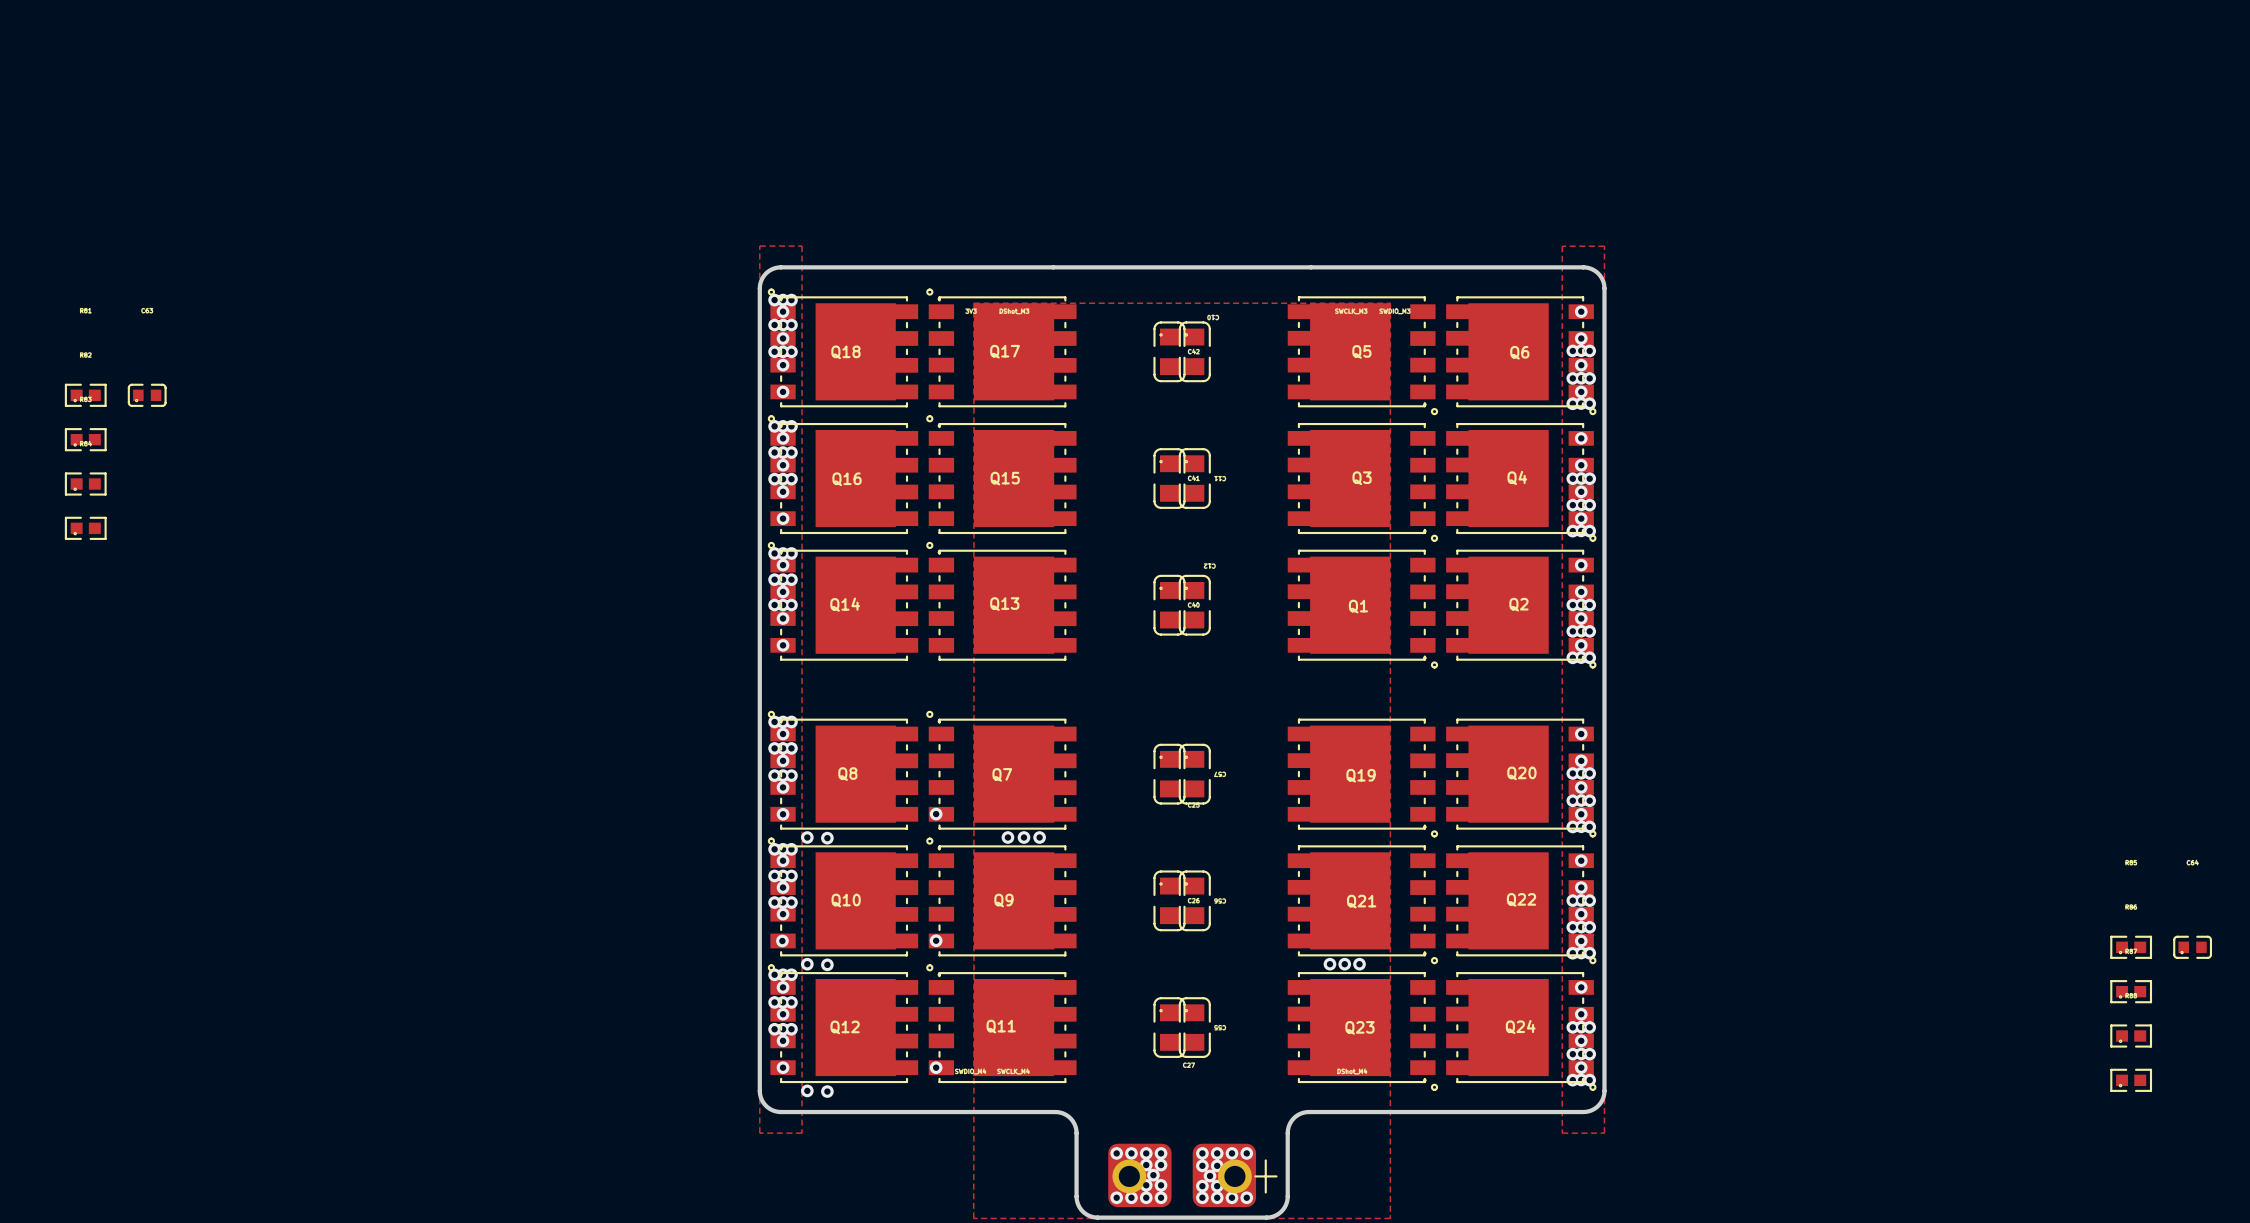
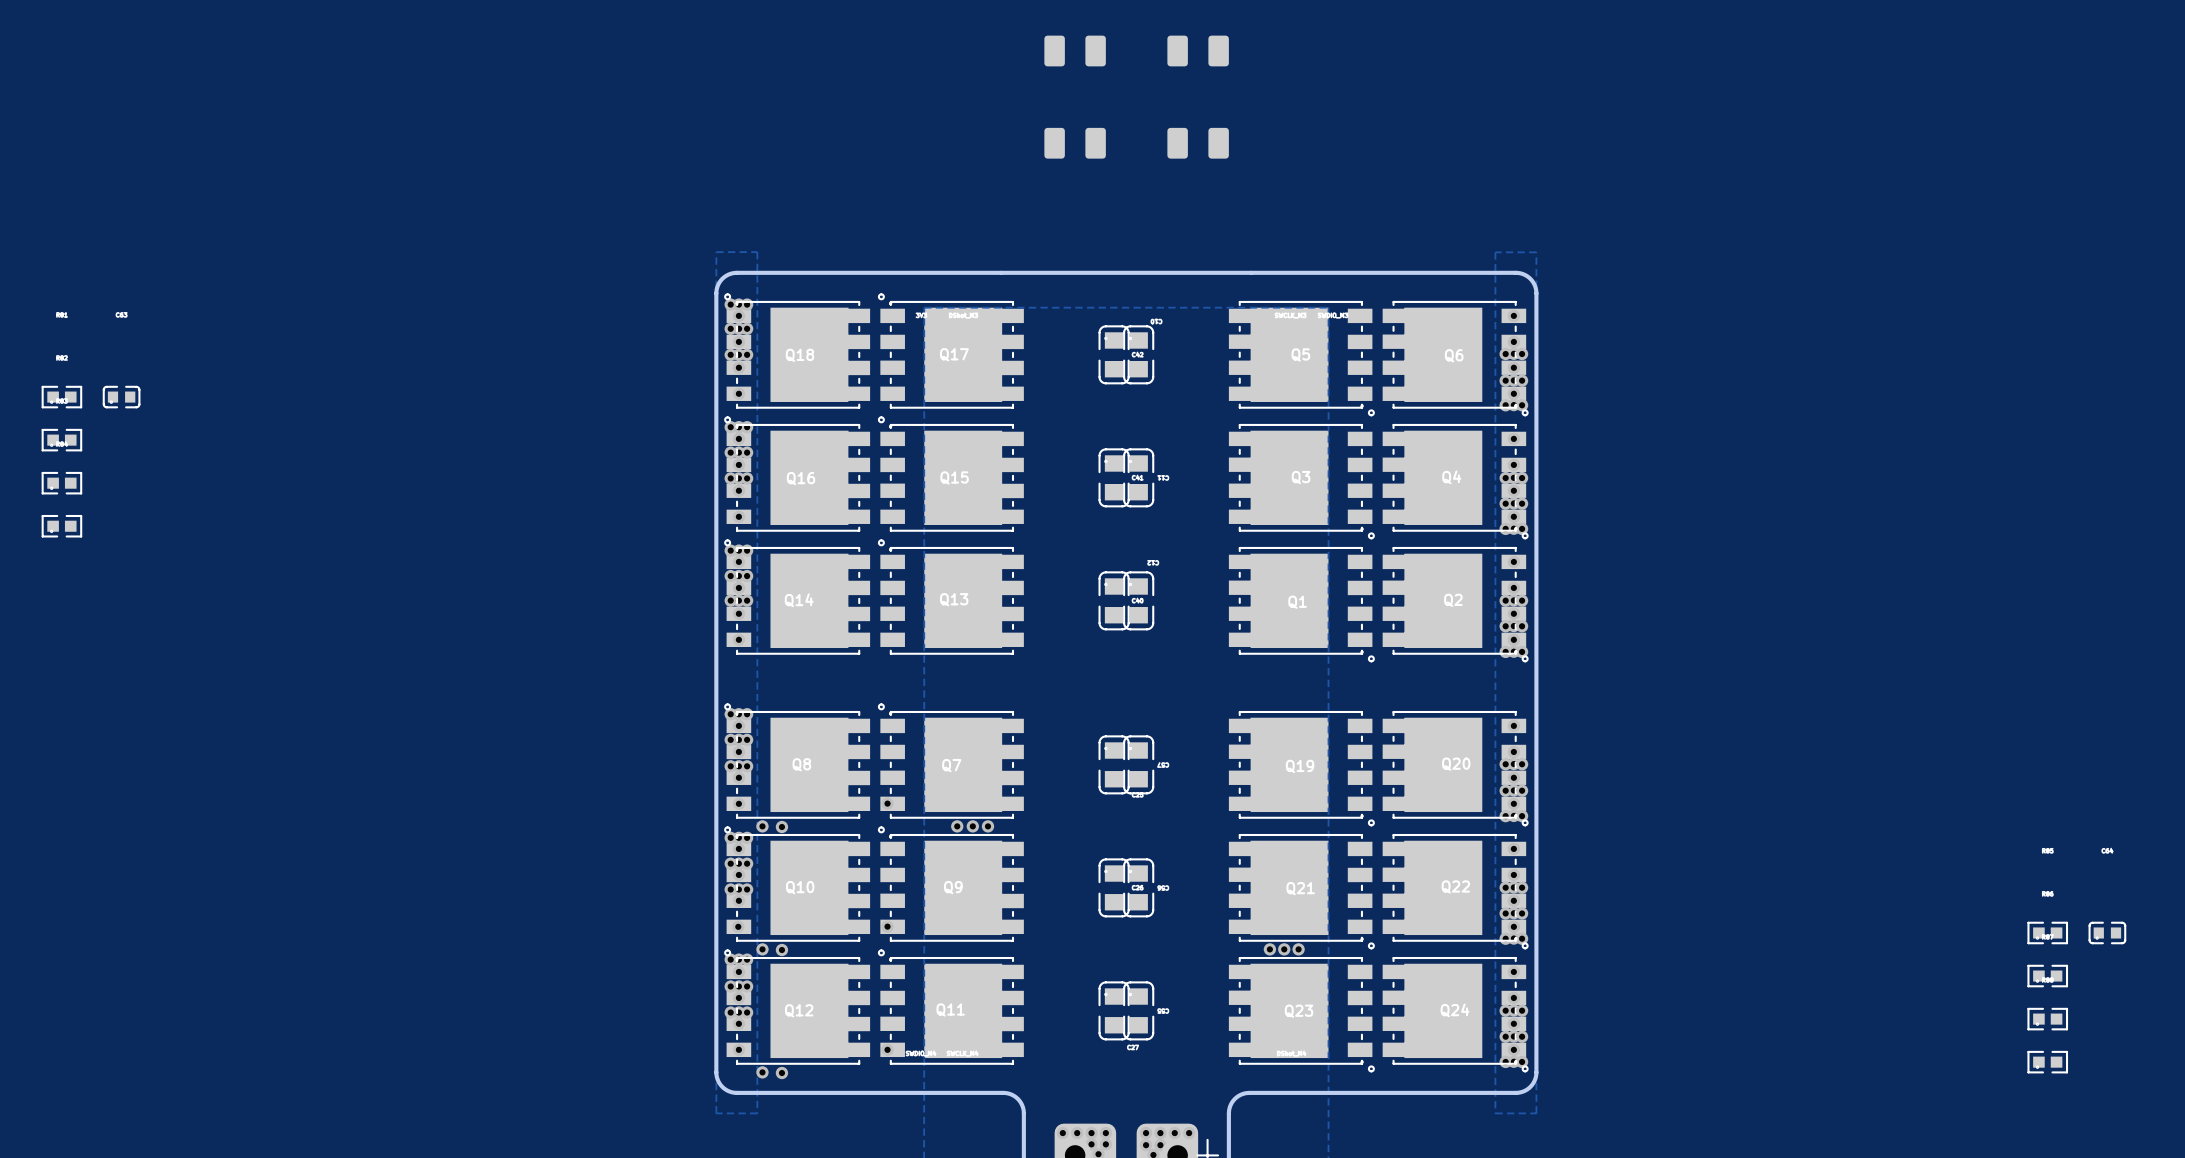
part: none -> (1054, 51)
part: none -> (1095, 51)
part: none -> (1177, 51)
part: none -> (1218, 51)
part: none -> (1054, 143)
part: none -> (1095, 143)
part: none -> (1177, 143)
part: none -> (1218, 143)

